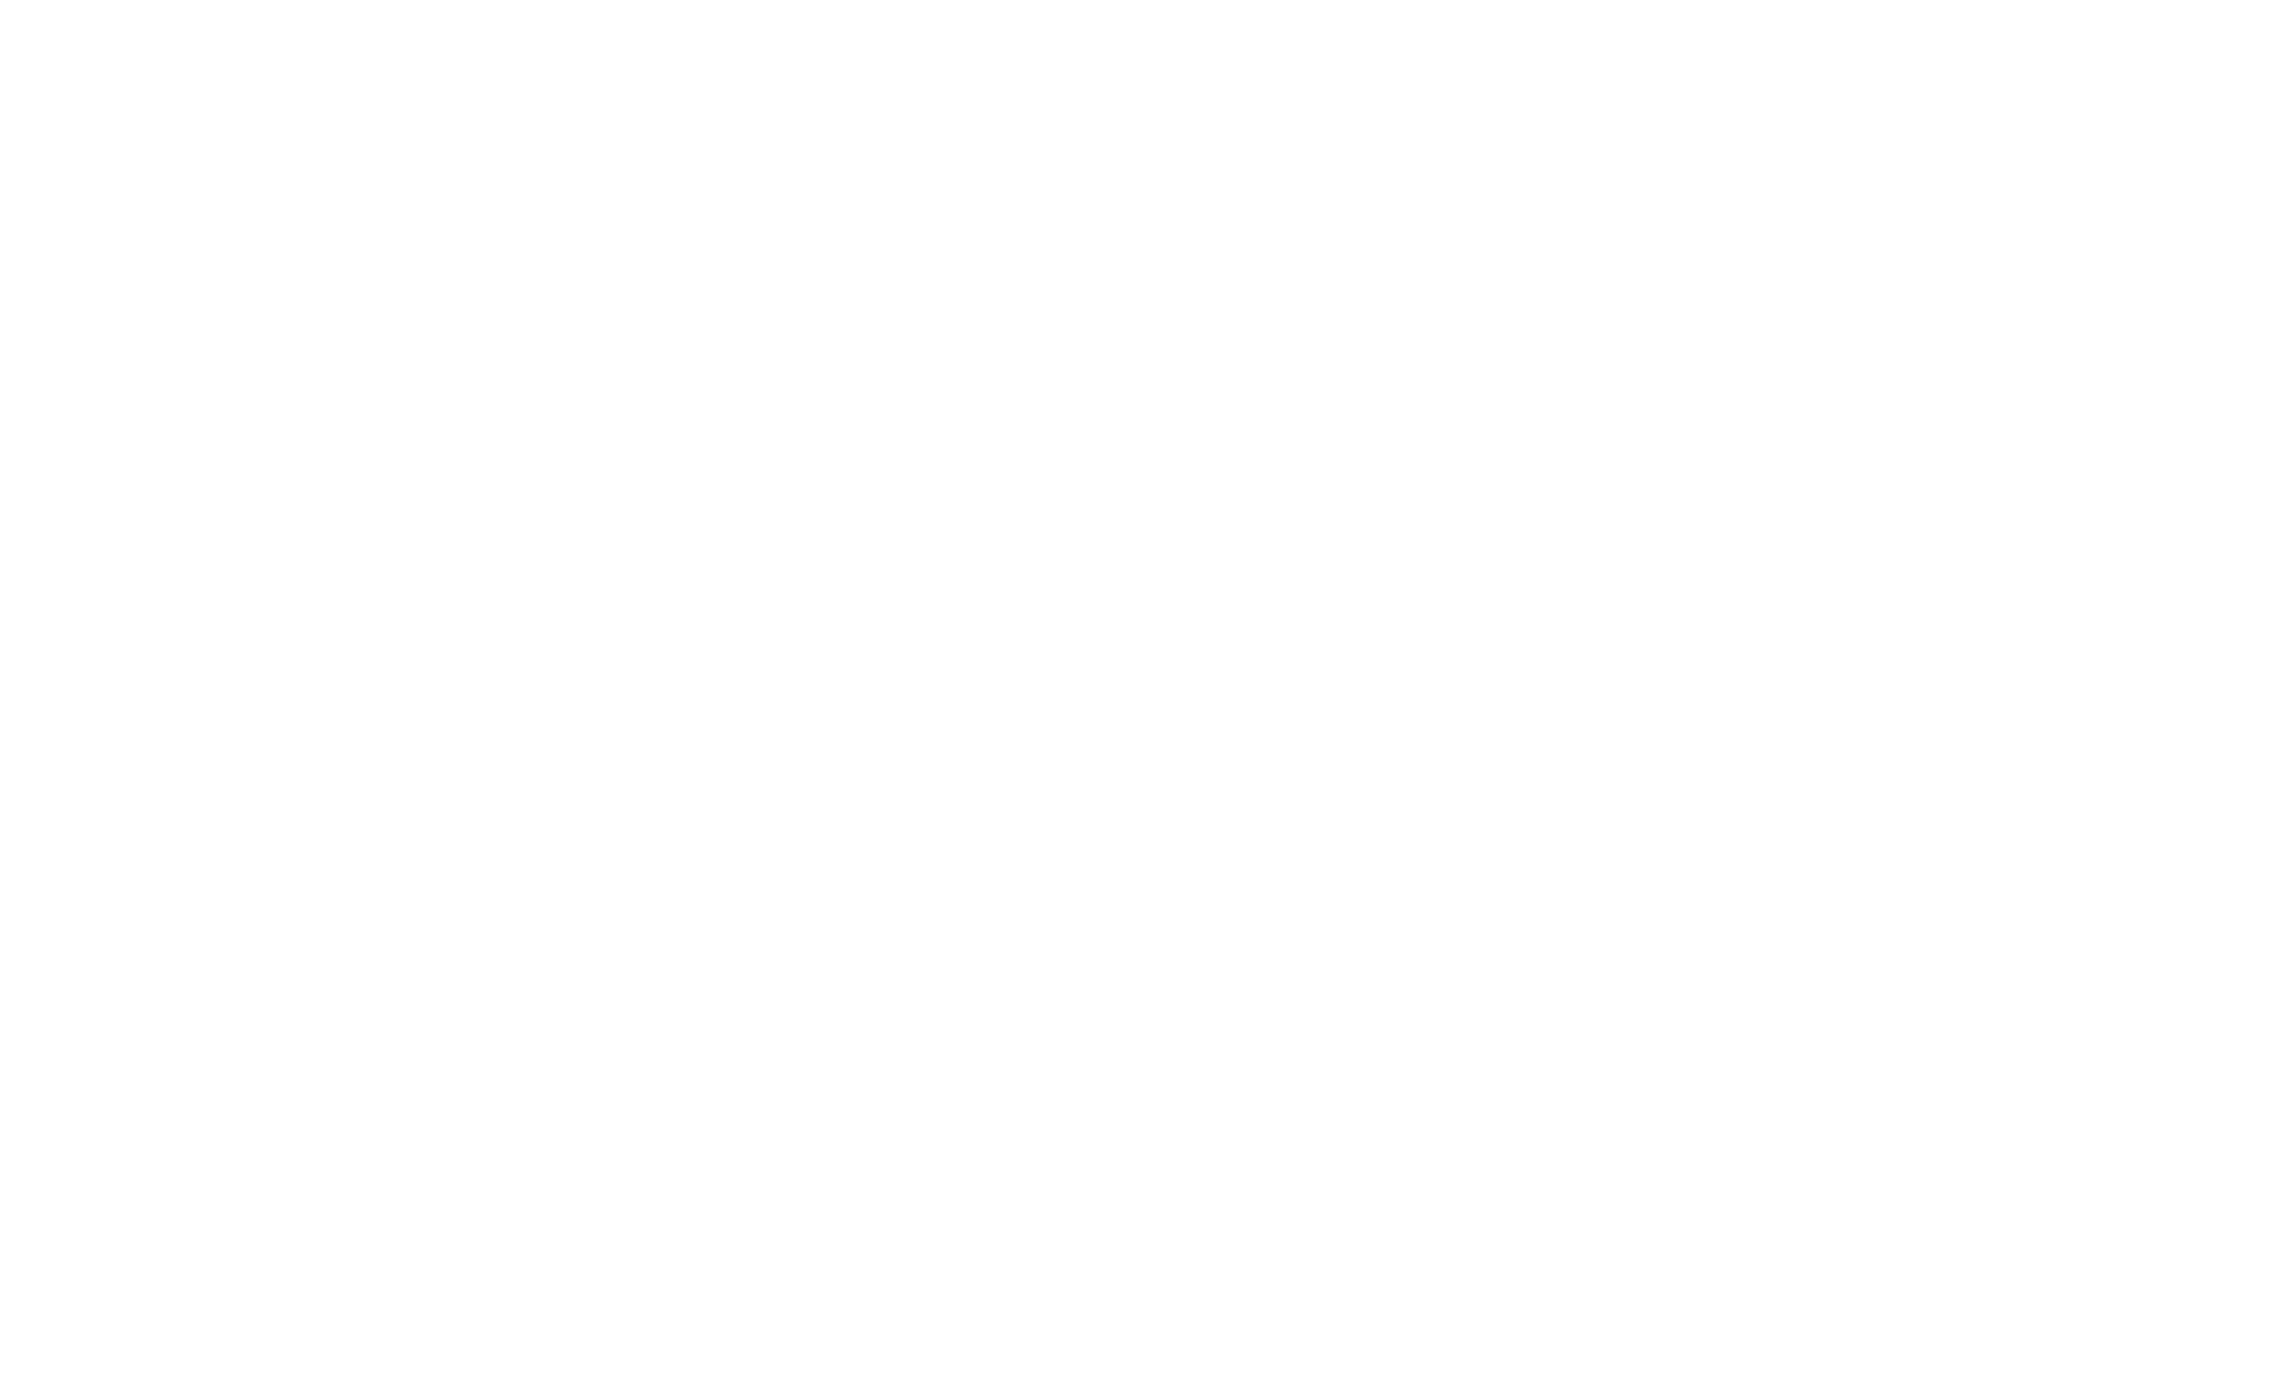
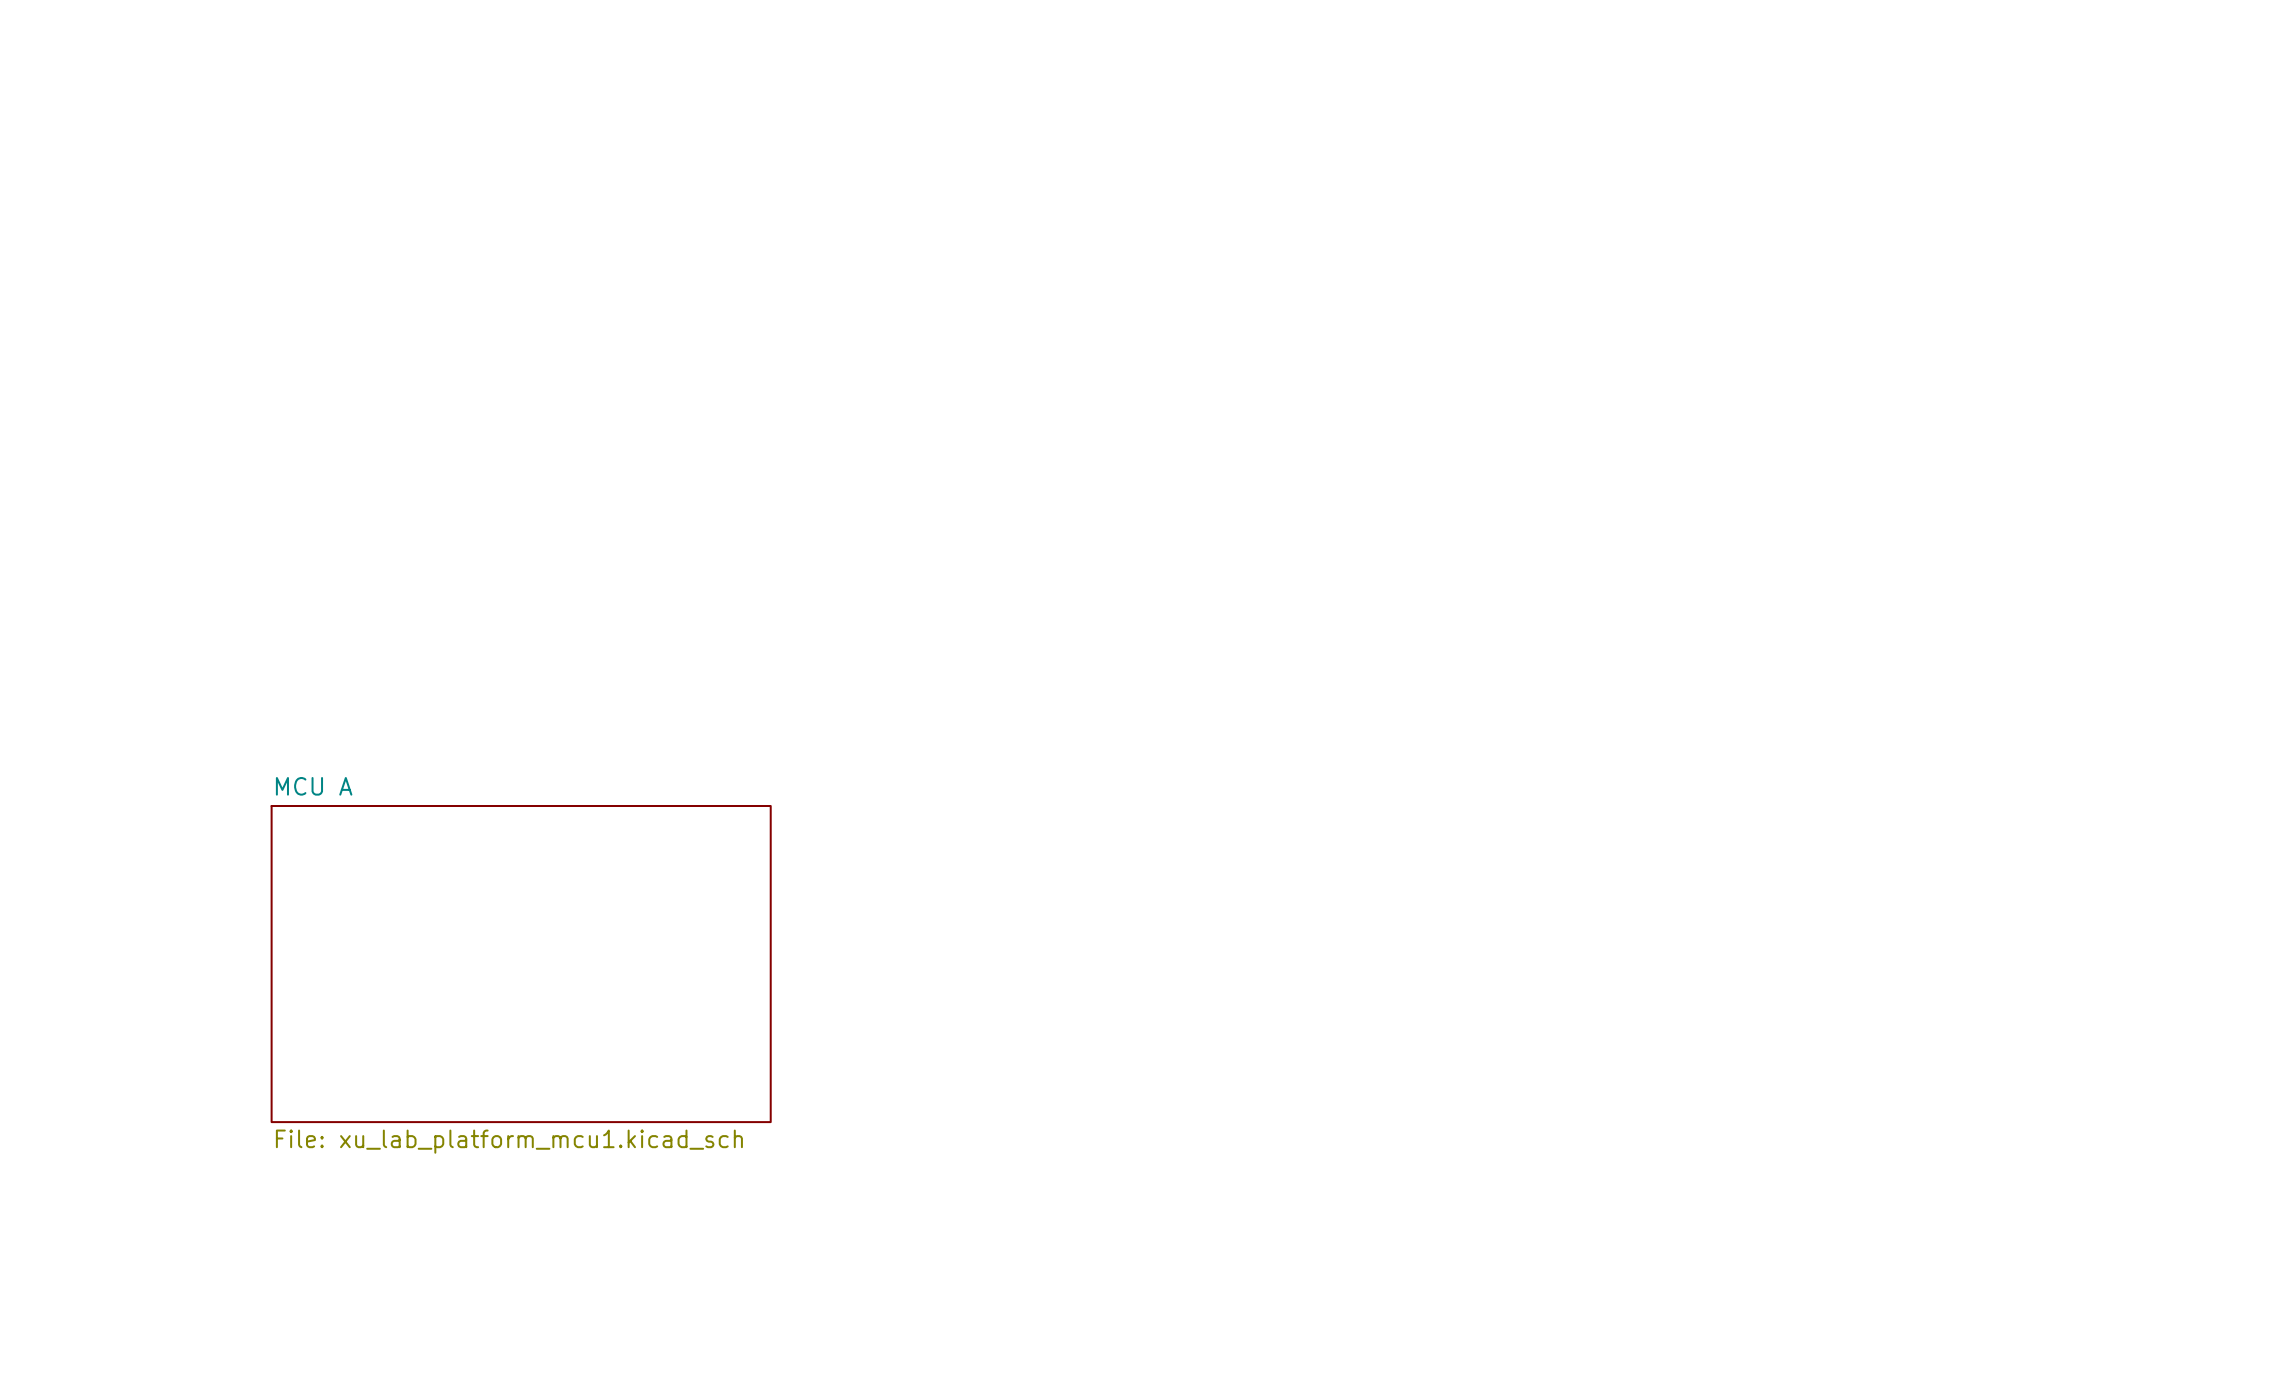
sheet MCU A: none -> File: xu_lab_platform_mcu1.kicad_sch (521, 964)

